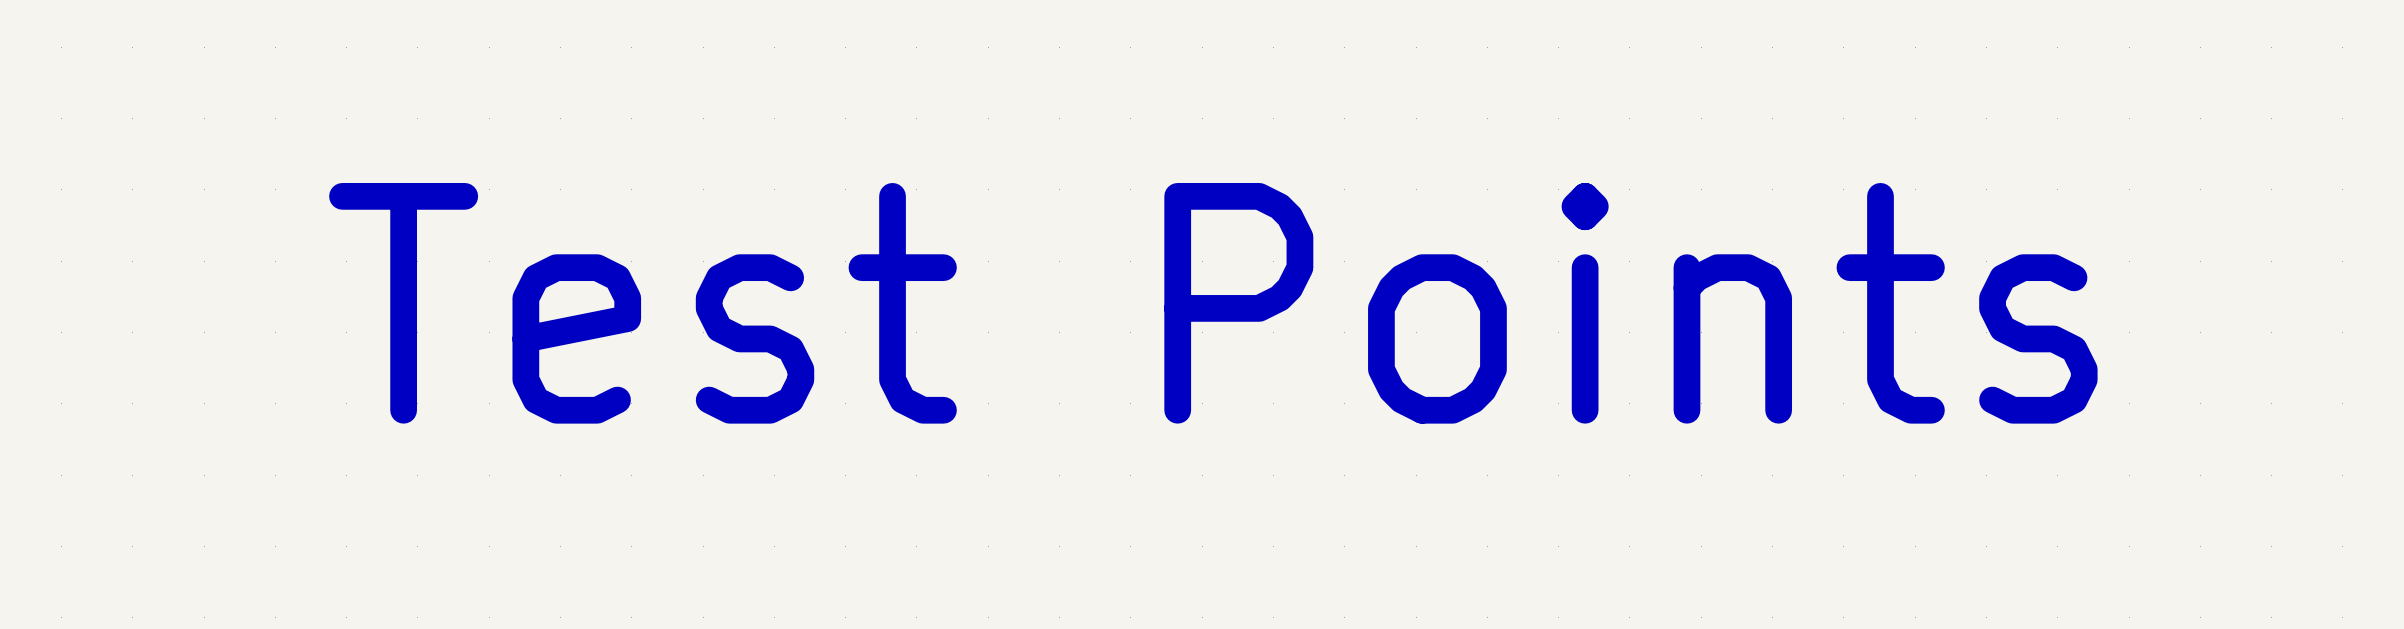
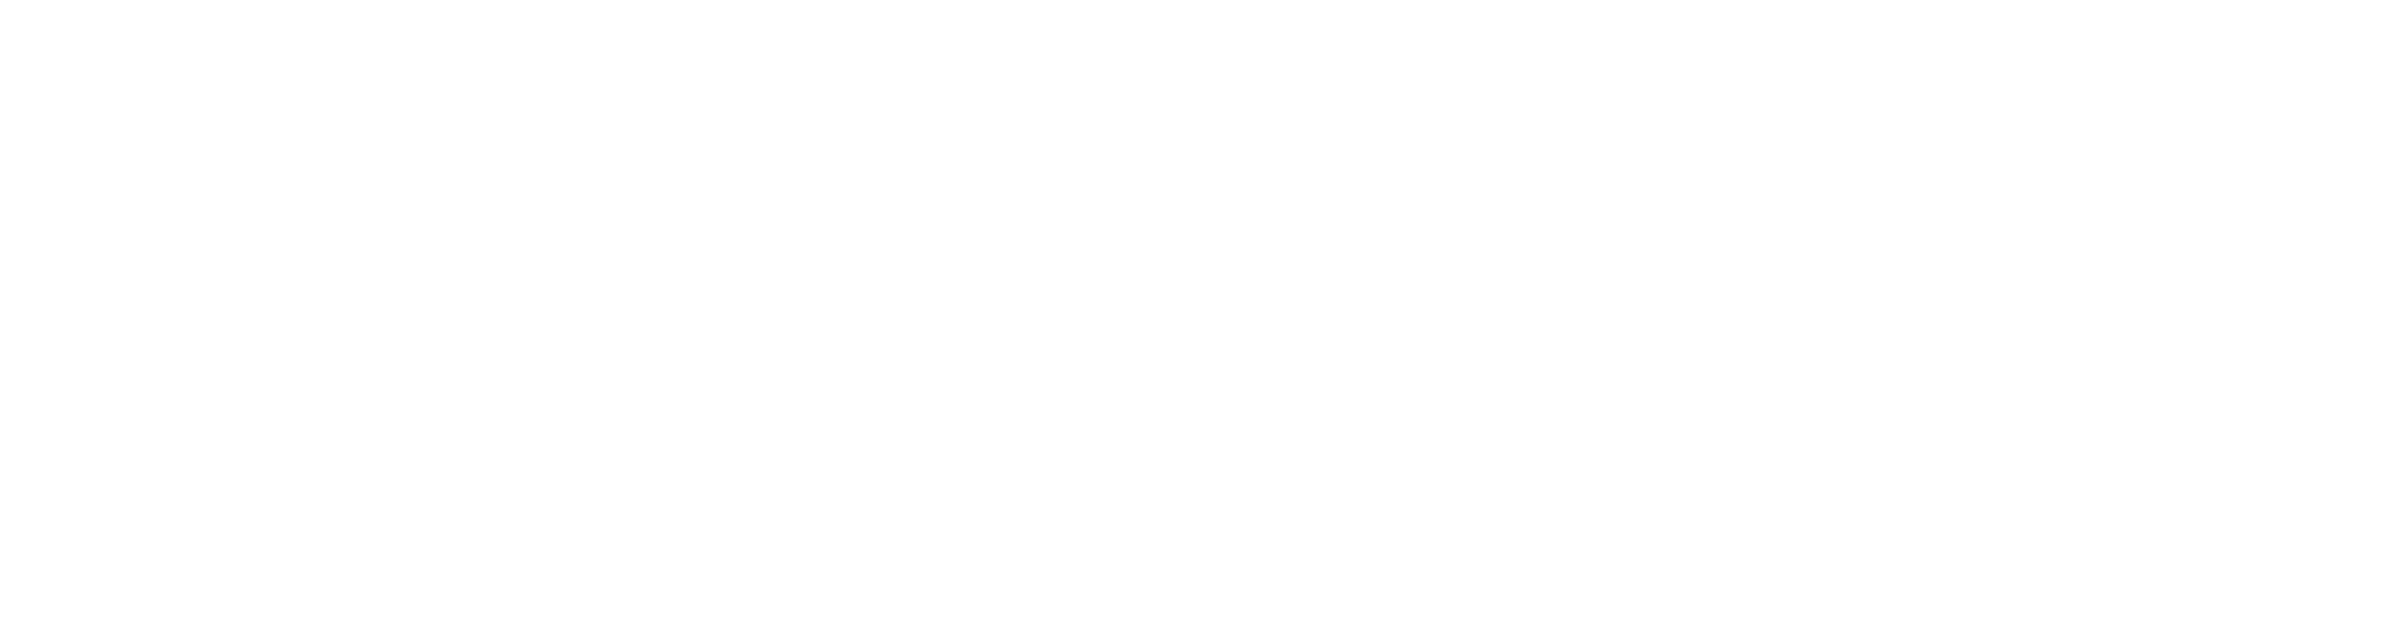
text: Test Points (1213, 303) -> none

